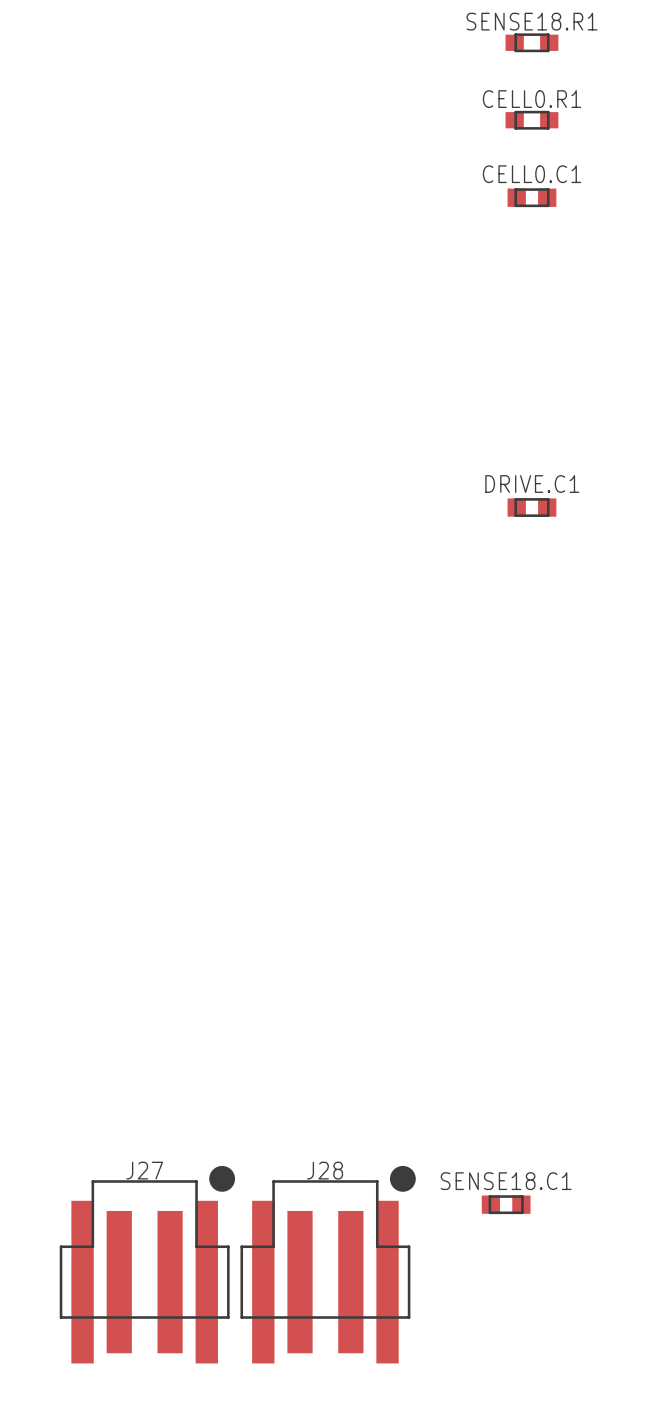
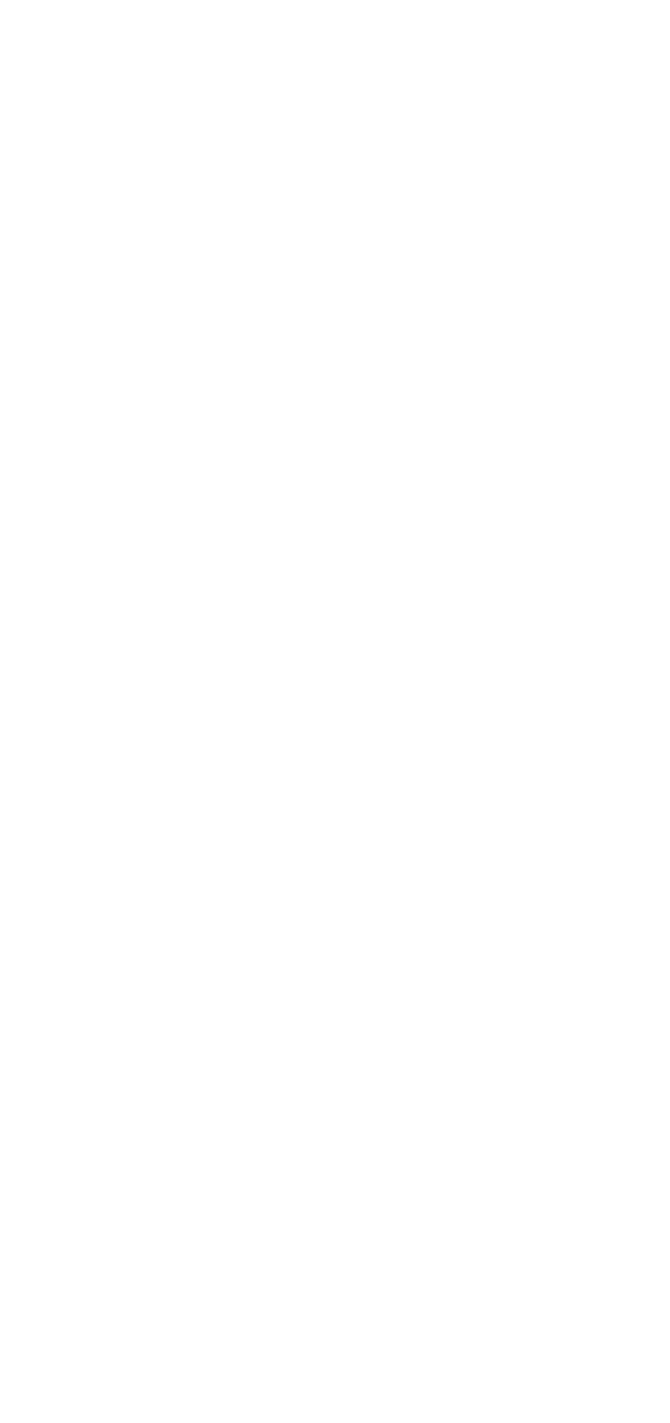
SENSE18.R1: (531, 42) -> none
CELL0.R1: (531, 120) -> none
CELL0.C1: (531, 197) -> none
DRIVE.C1: (531, 507) -> none
SENSE18.C1: (506, 1204) -> none
J27: (147, 1264) -> none
J28: (328, 1264) -> none

